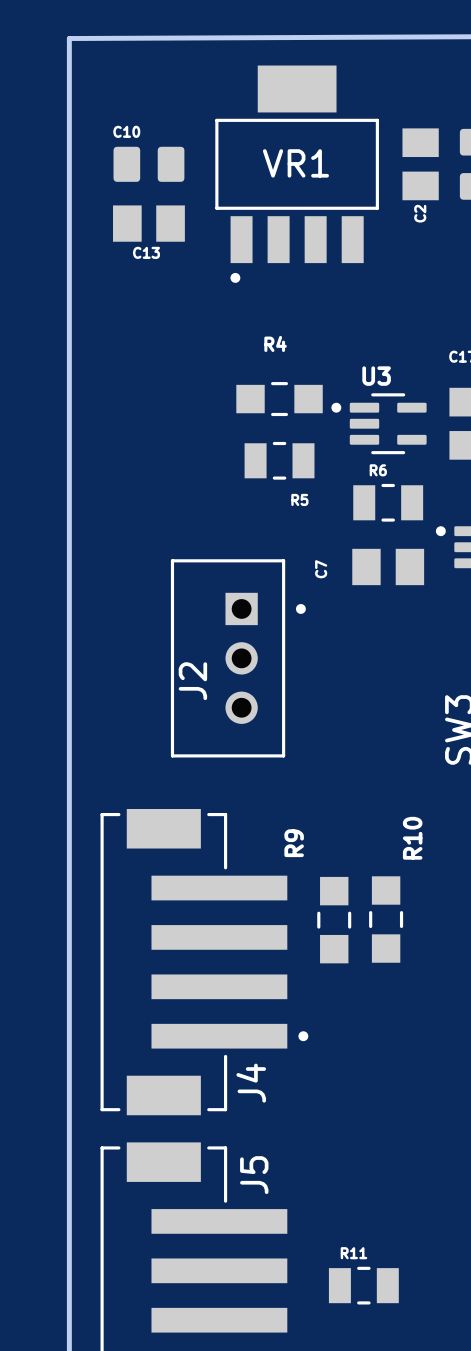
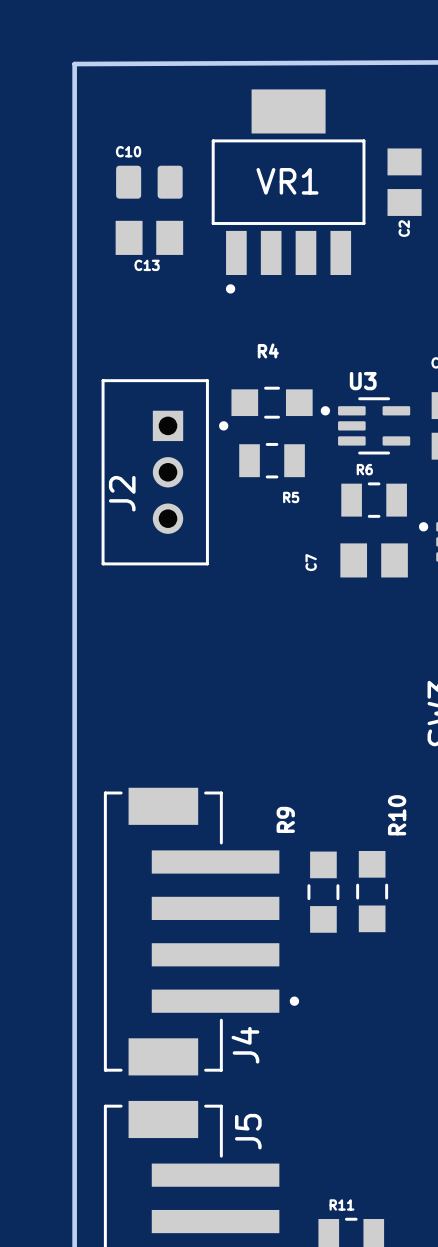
J2 position: (238, 658) -> (164, 472)

